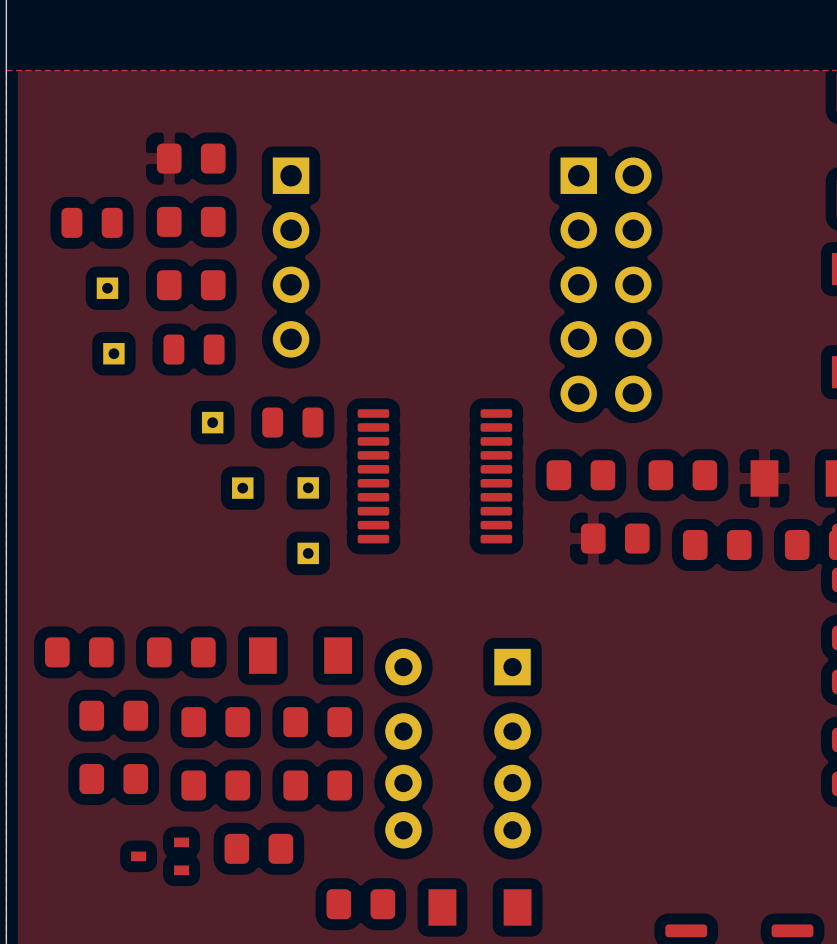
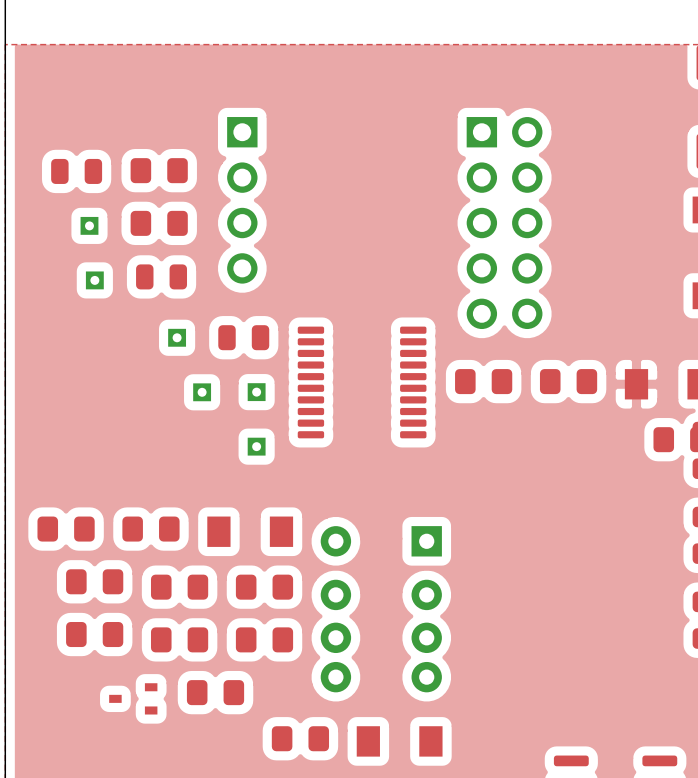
part: (191, 158) -> none
part: (615, 538) -> none
part: (717, 545) -> none

